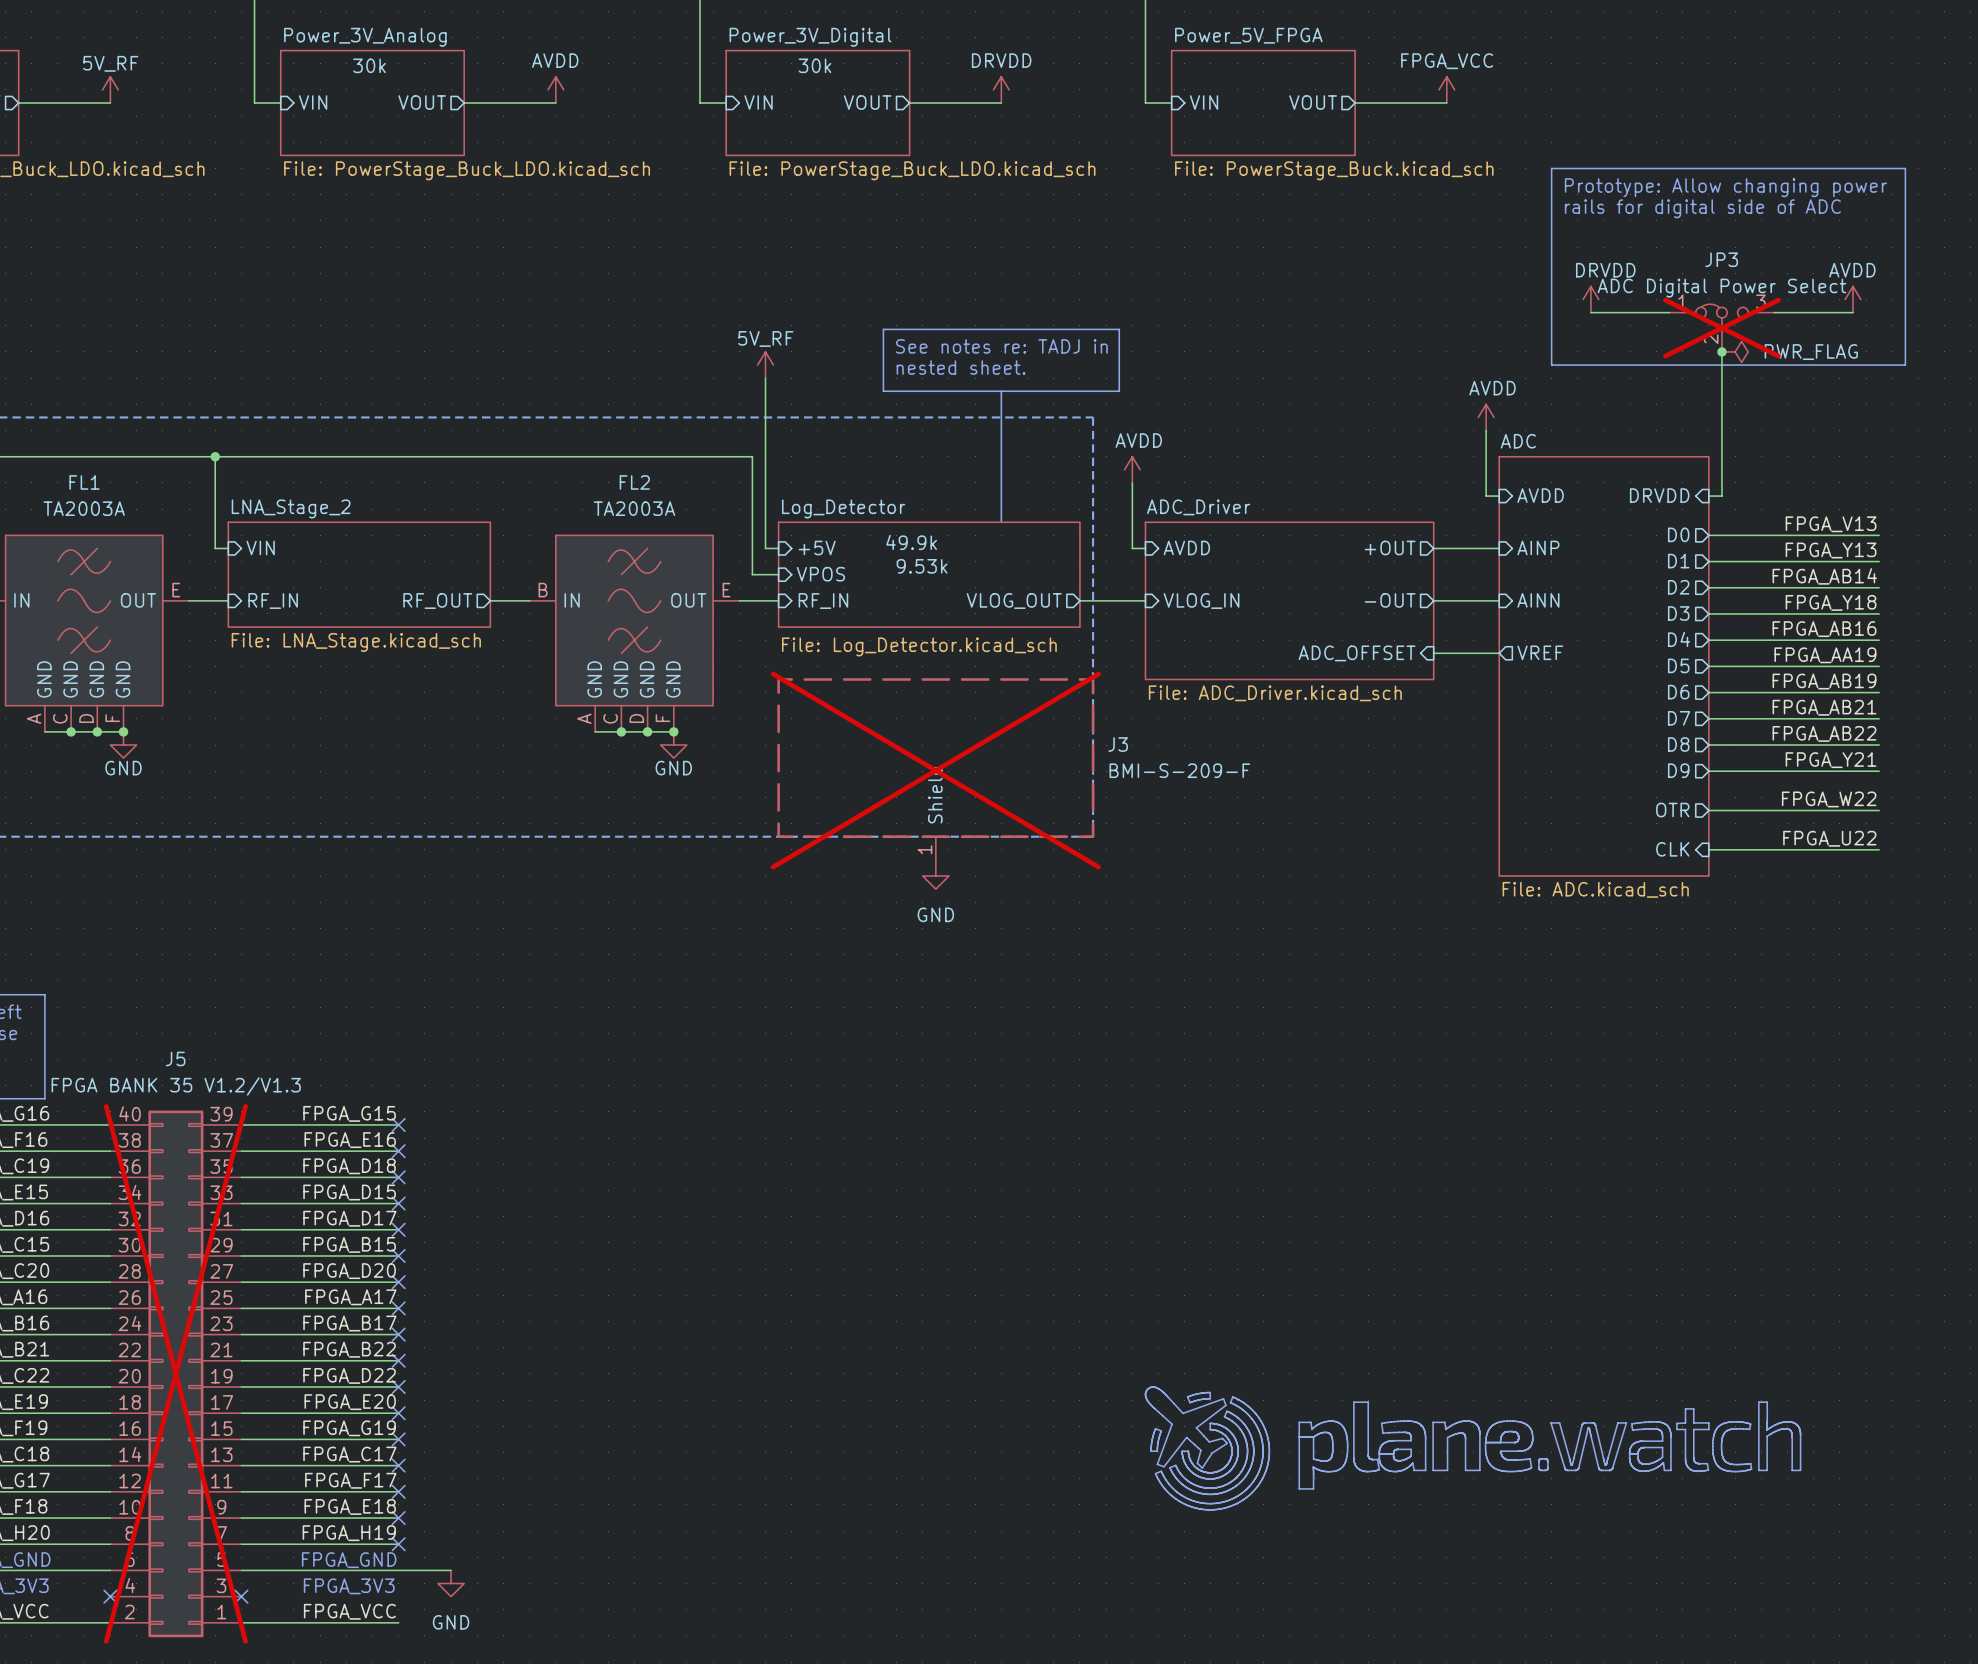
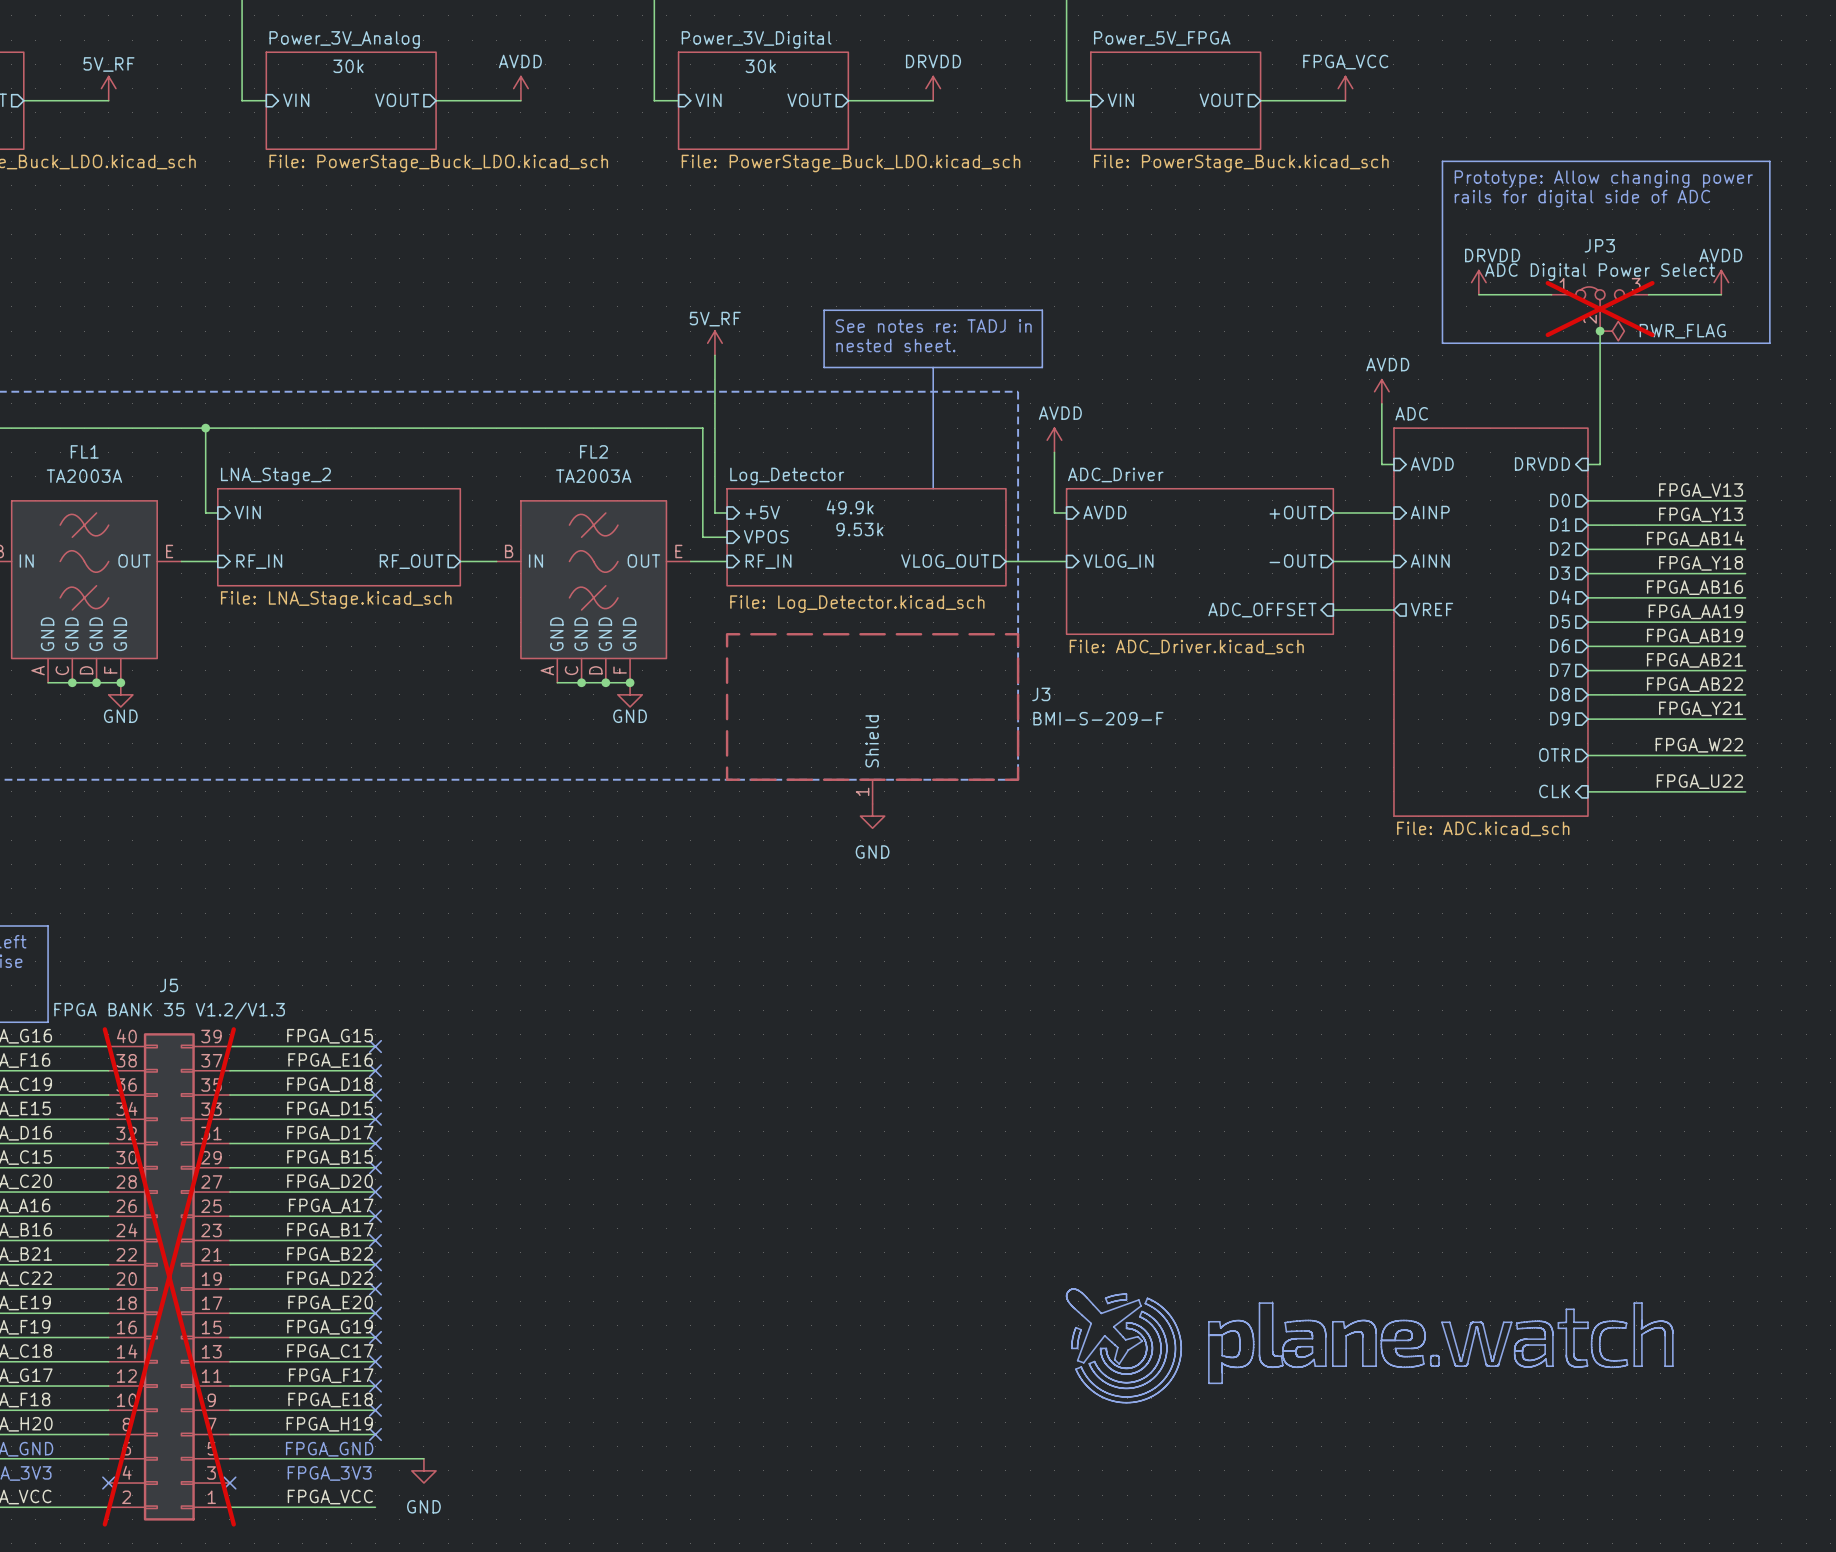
J3 do-not-place cross: (935, 770) -> none

